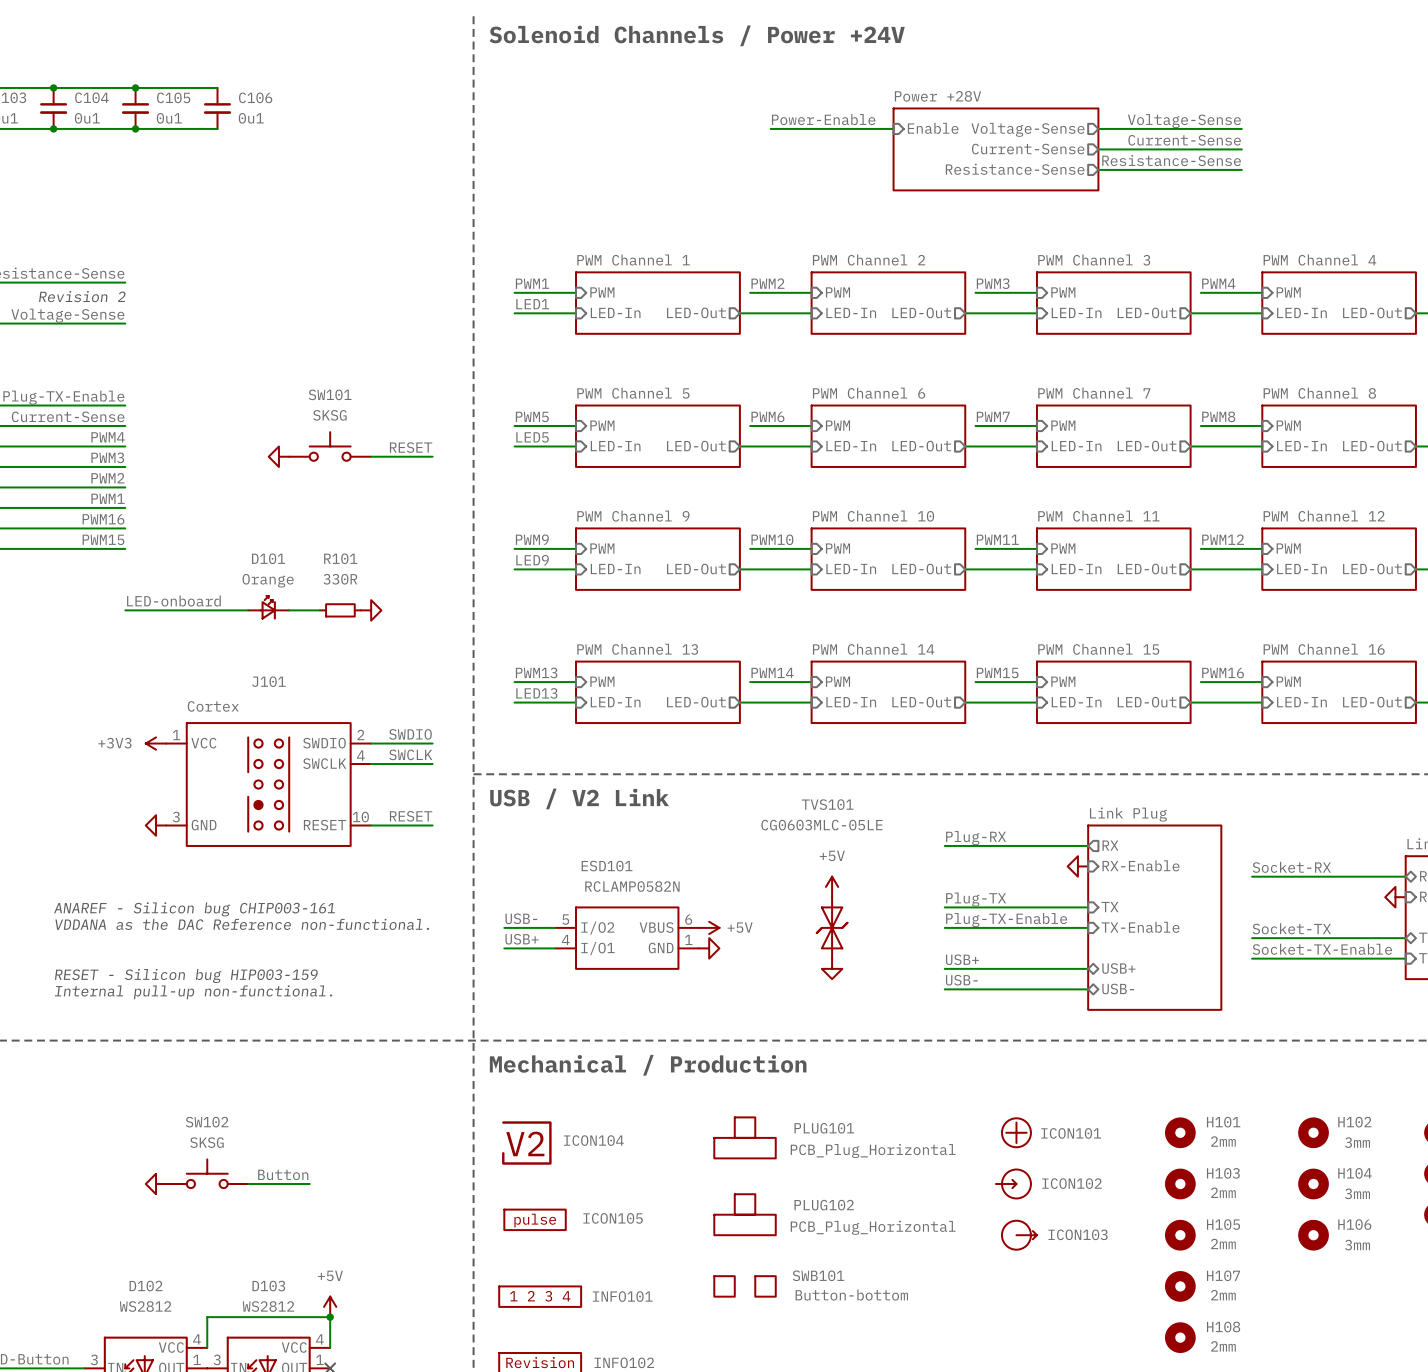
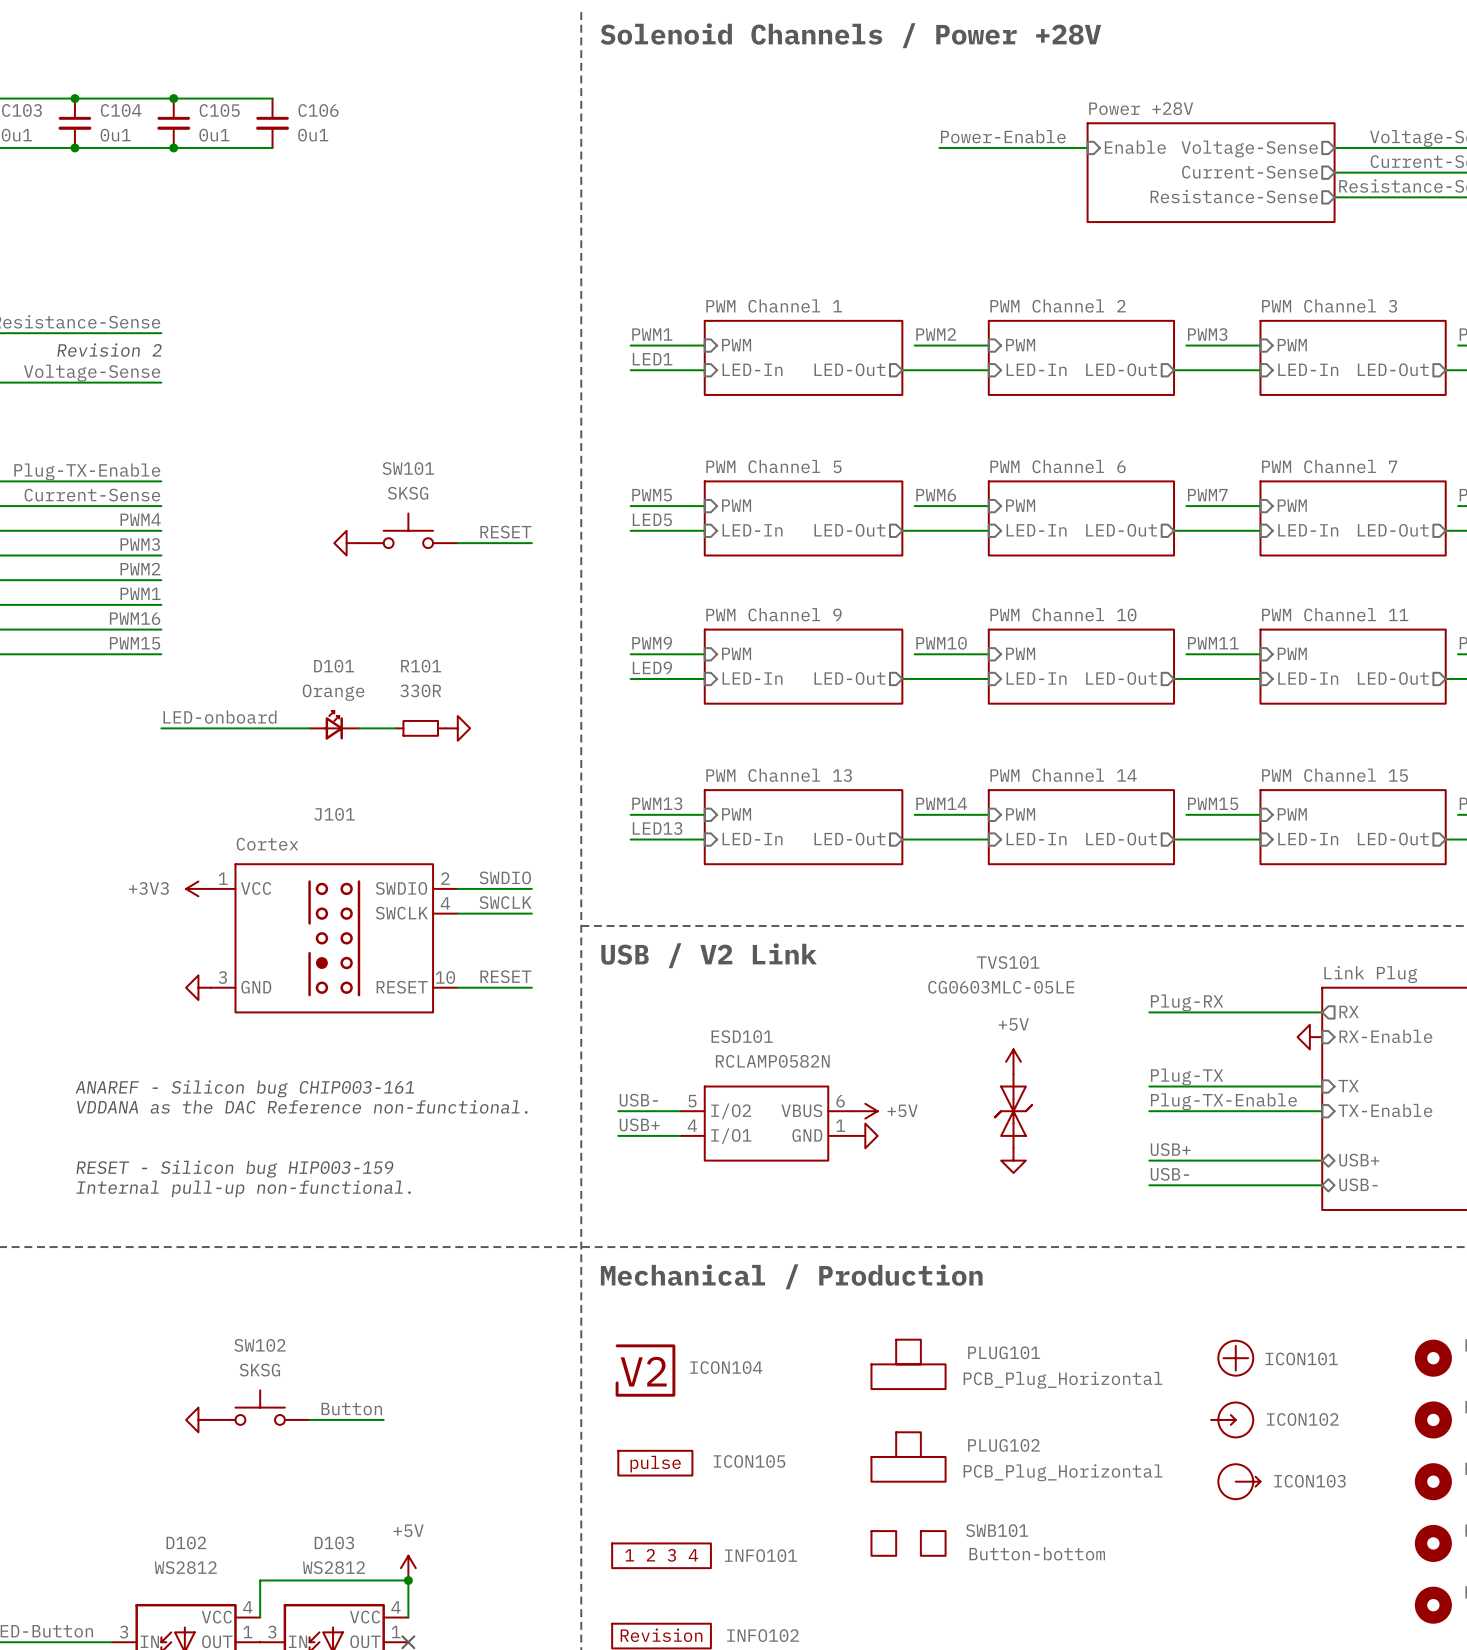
text: Solenoid Channels / Power +24V (697, 35) -> Solenoid Channels / Power +28V (850, 35)

